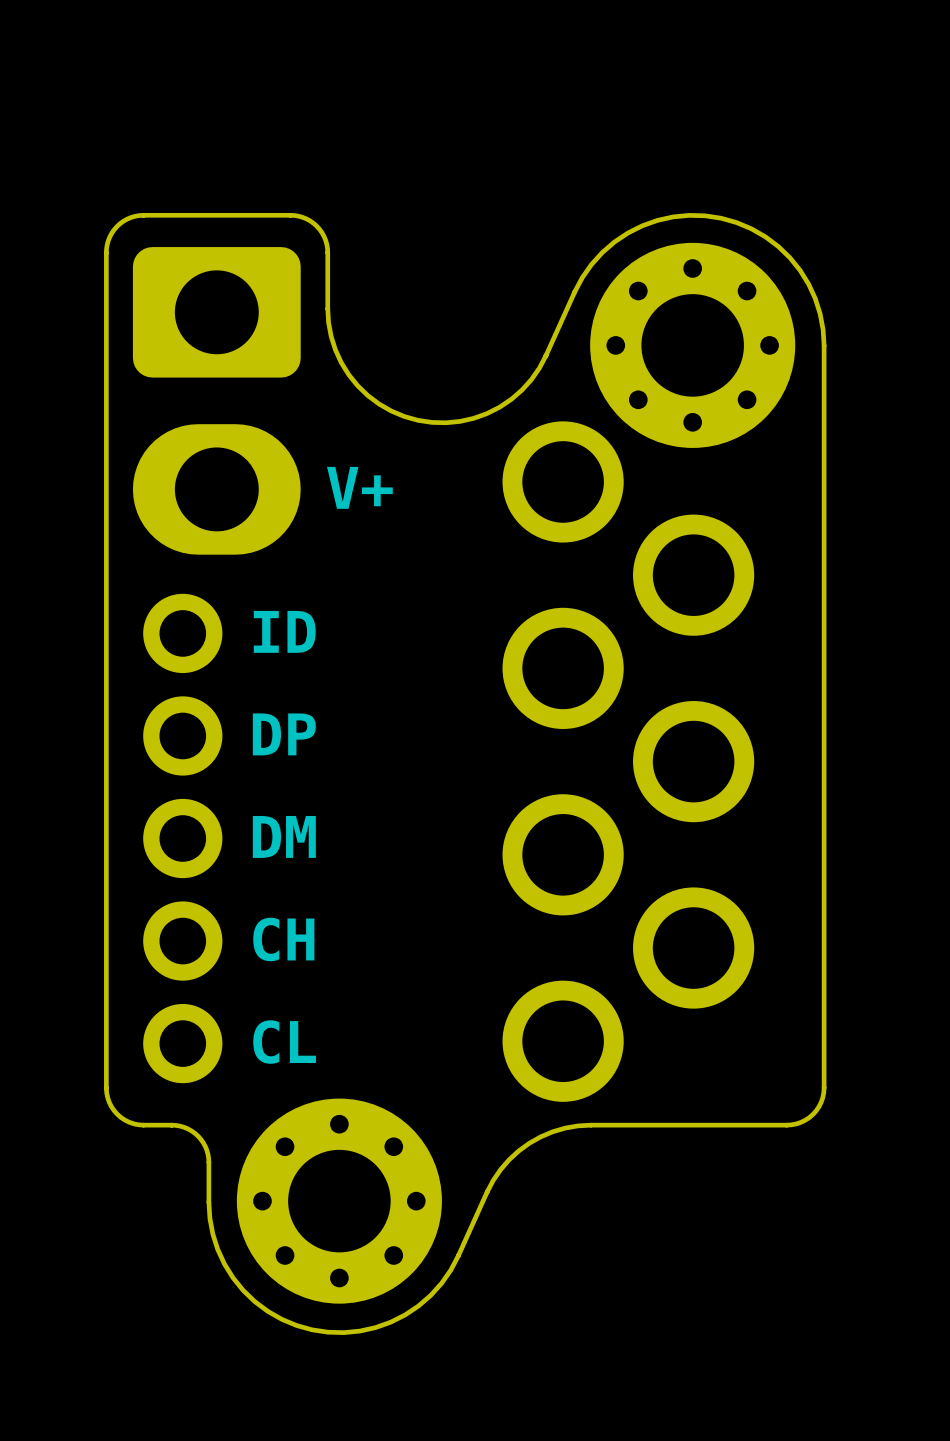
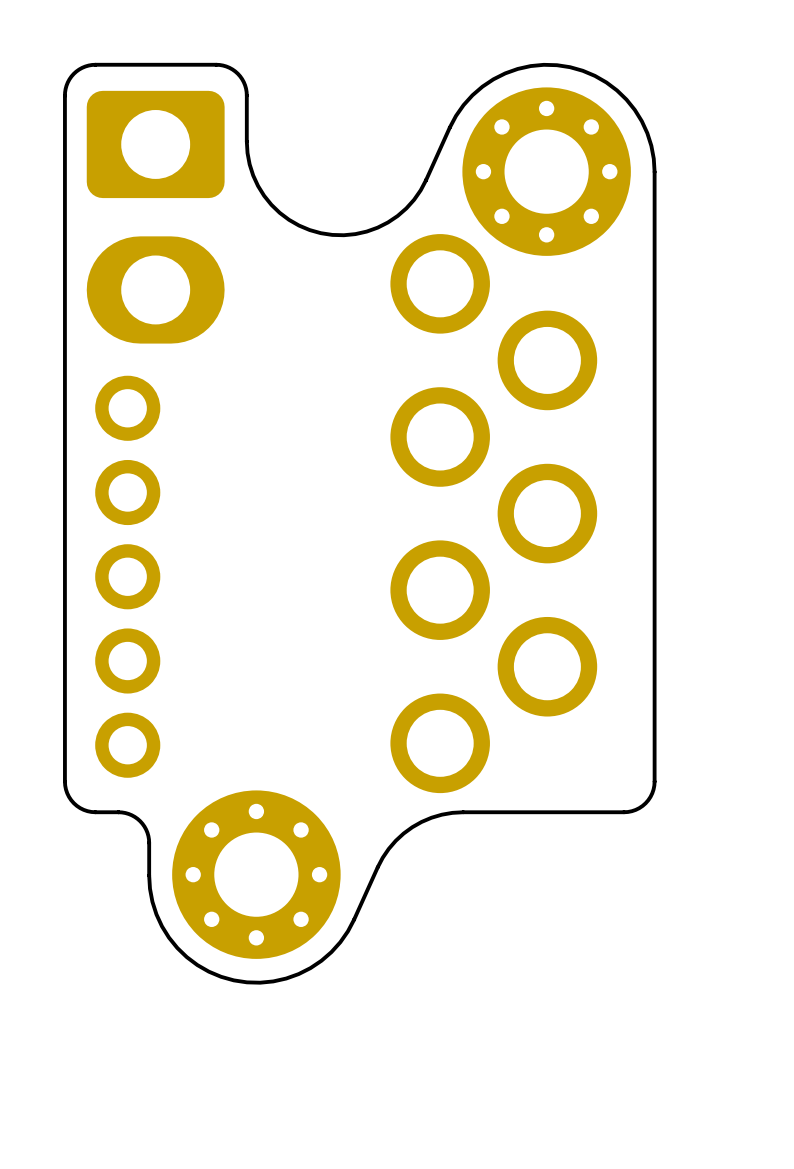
text: V+ (359, 487) -> none
text: ID (284, 631) -> none
text: DP (284, 734) -> none
text: DM (284, 836) -> none
text: CH (283, 939) -> none
text: CL (284, 1042) -> none

